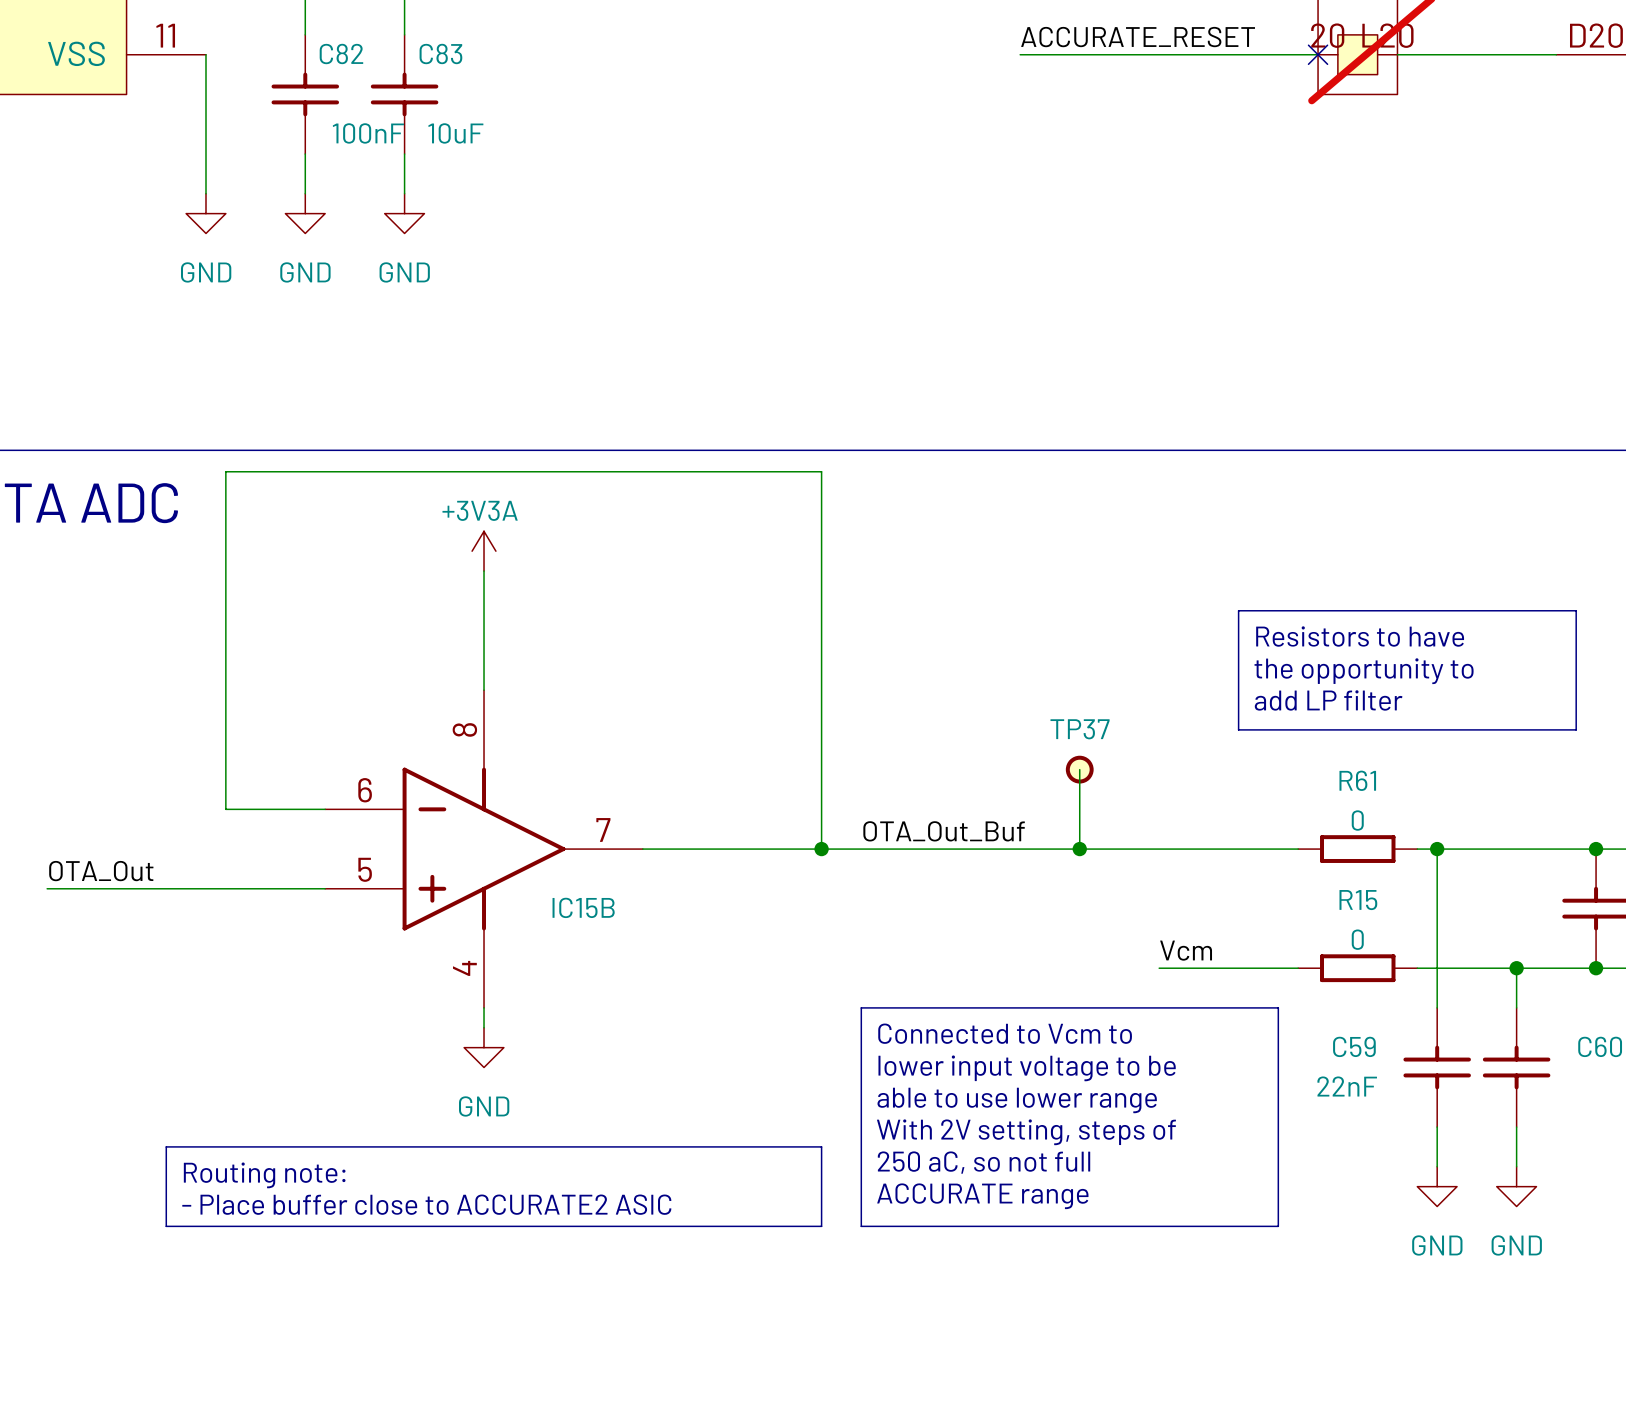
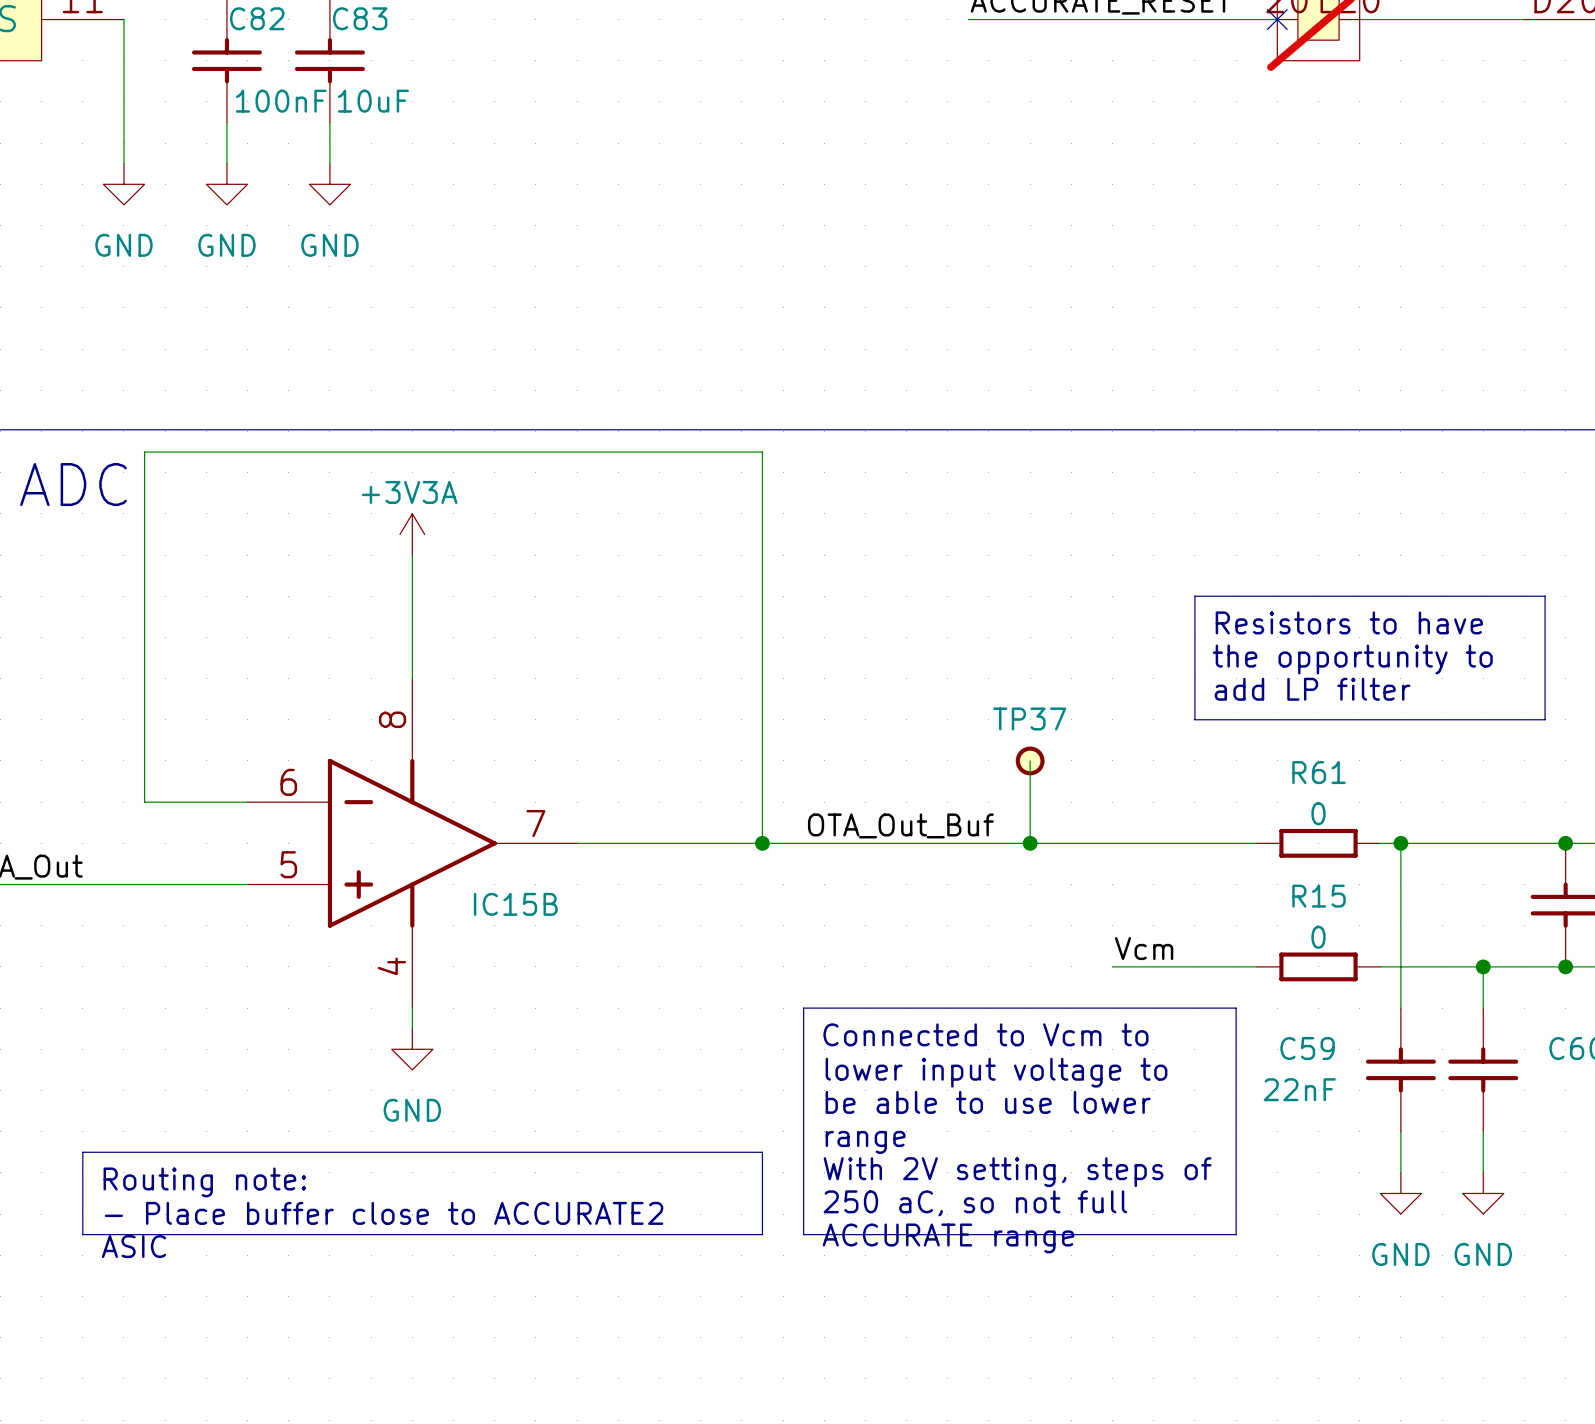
text: lower input voltage to be (1027, 1068) -> lower input voltage to (996, 1072)
text: able to use lower range (1017, 1100) -> be able to use lower (988, 1102)
text: With 2V setting, steps of (1026, 1132) -> range (865, 1142)
text: 250 aC, so not full (984, 1162) -> With 2V setting, steps of (1017, 1172)
text: ACCURATE range (982, 1196) -> 250 aC, so not full (975, 1203)
text: - Place buffer close to ACCURATE2 ASIC (426, 1204) -> - Place buffer close to ACCURATE2 (384, 1213)
text: none -> ACCURATE range (948, 1238)
text: none -> ASIC (133, 1246)

